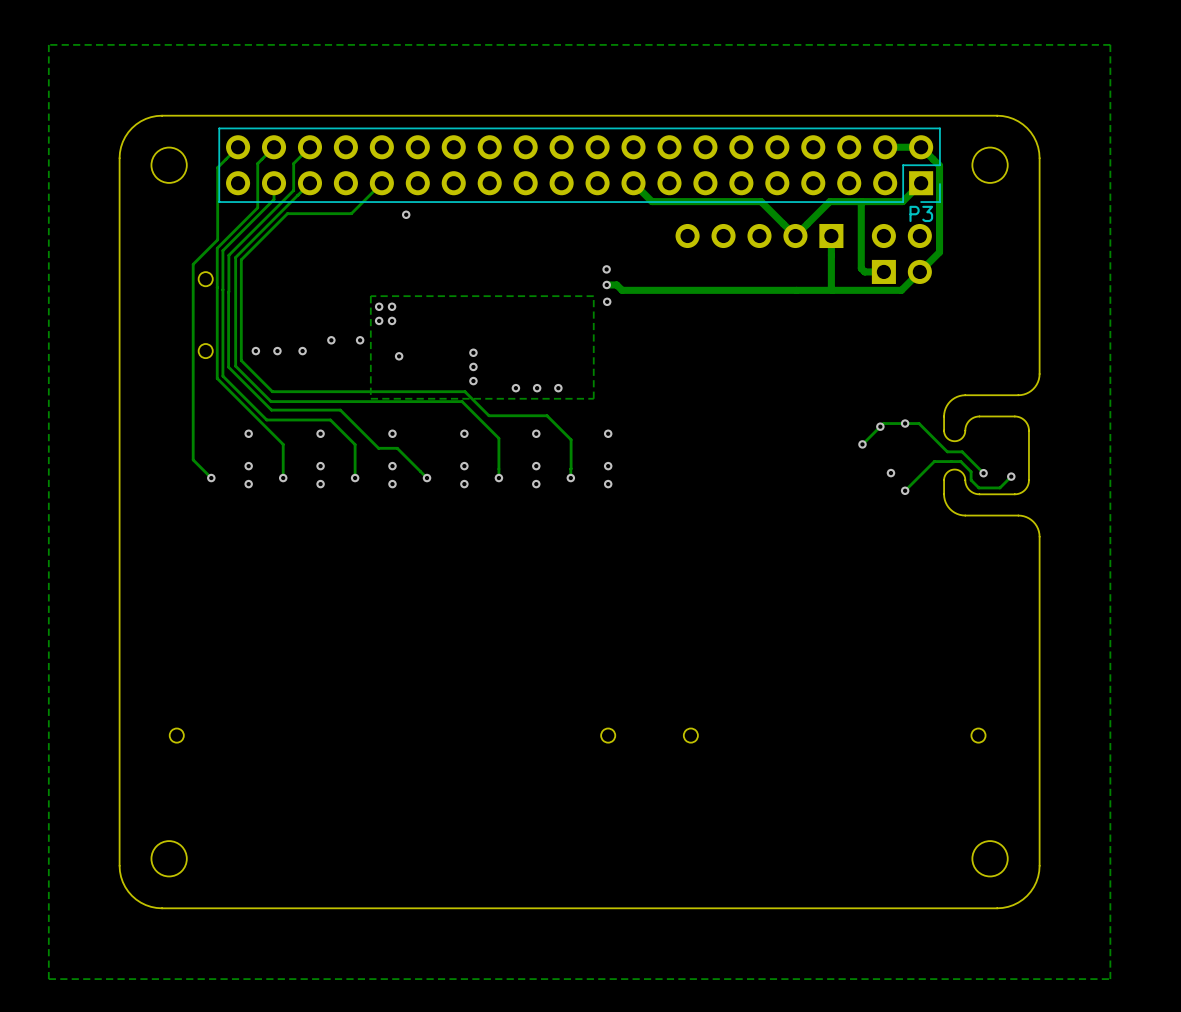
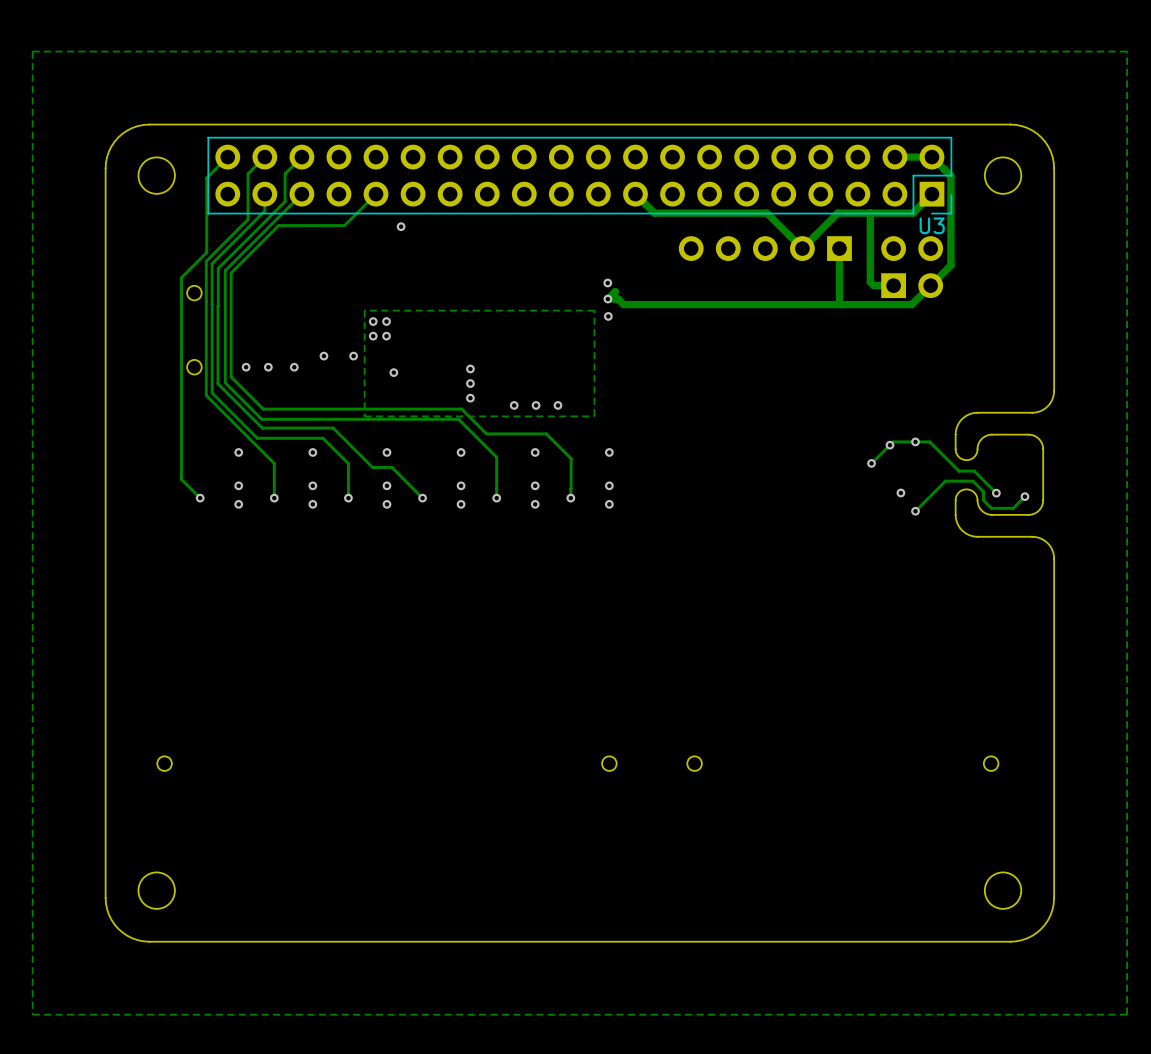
P3 name: P3 (921, 213) -> U3 (932, 225)
track: none -> (615, 291) (607, 299)

